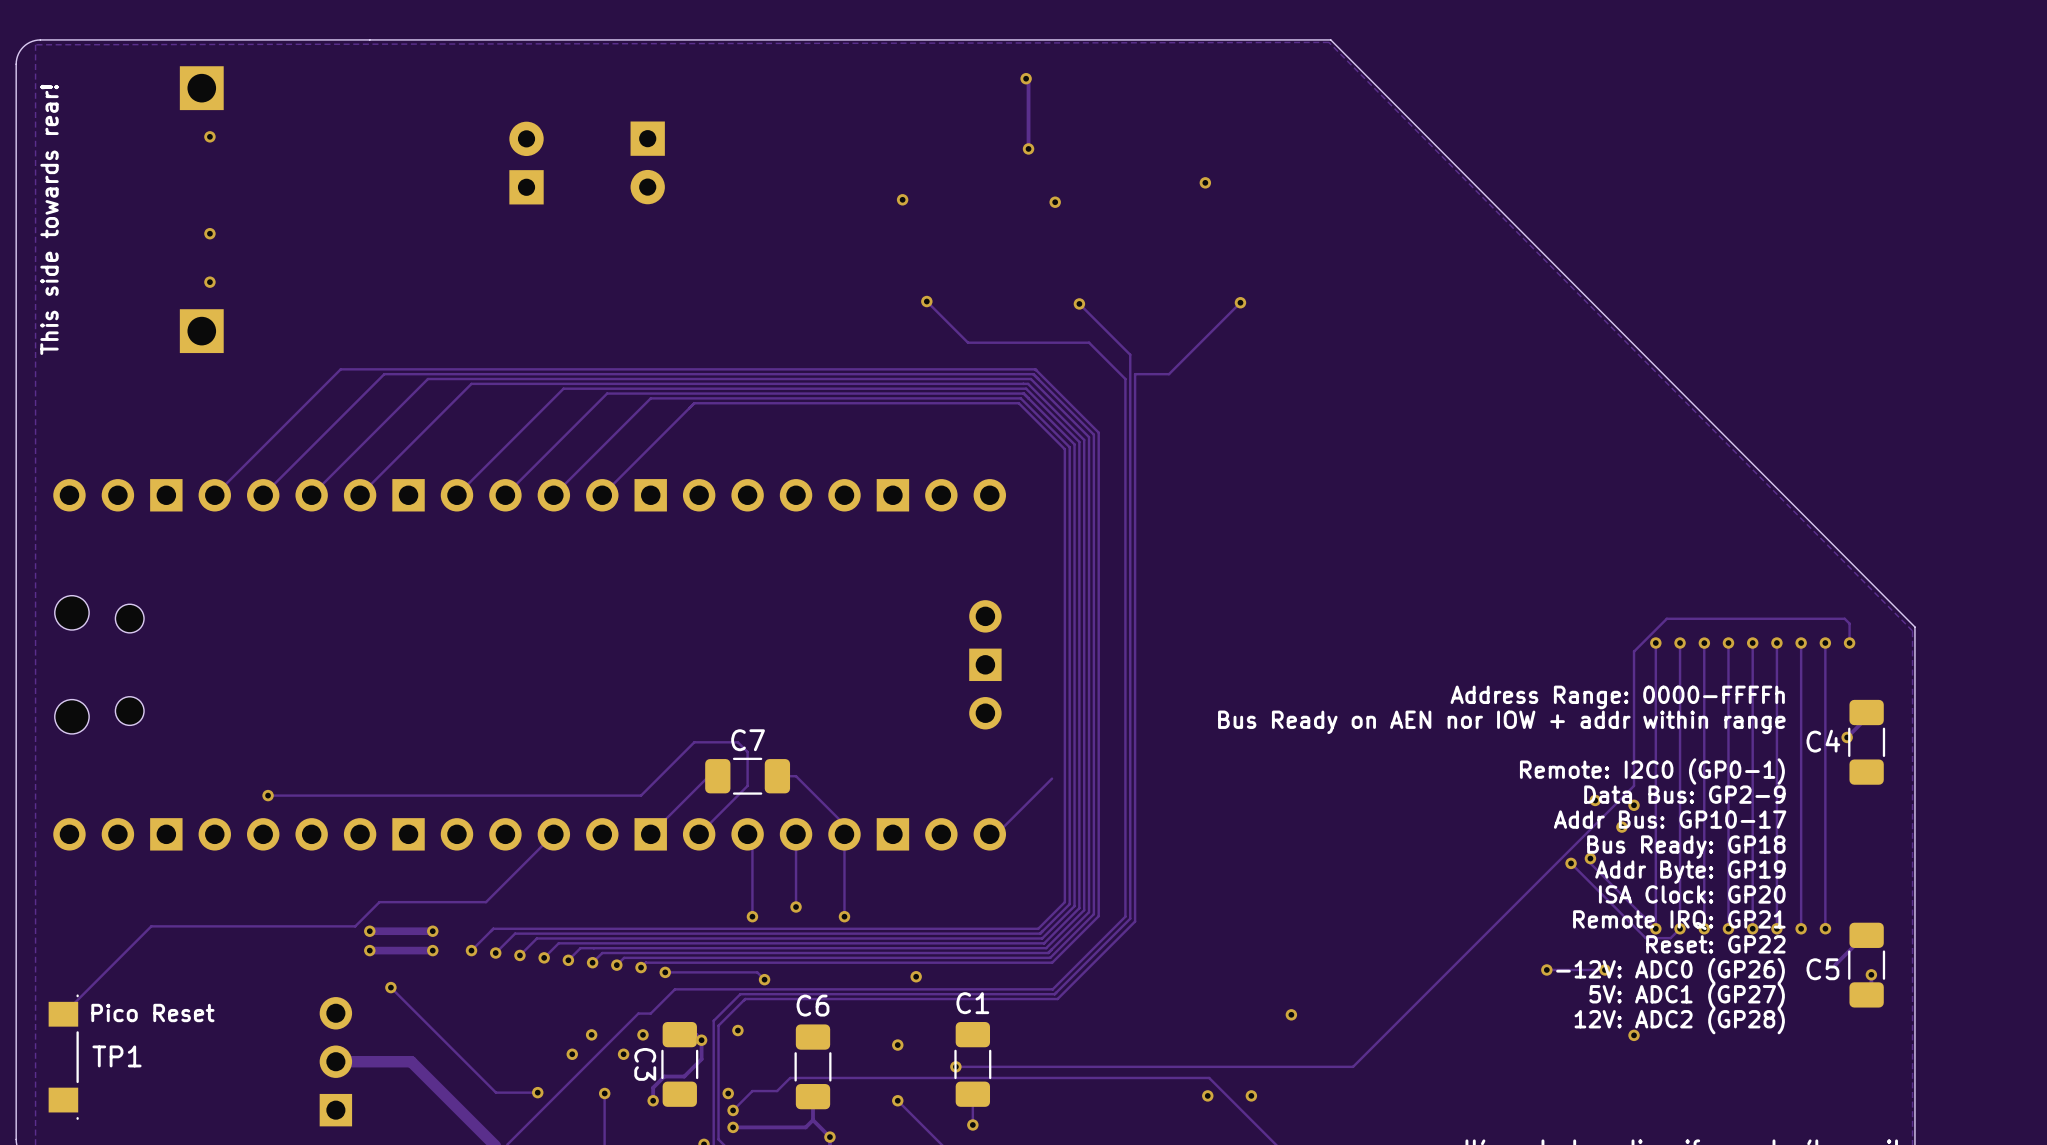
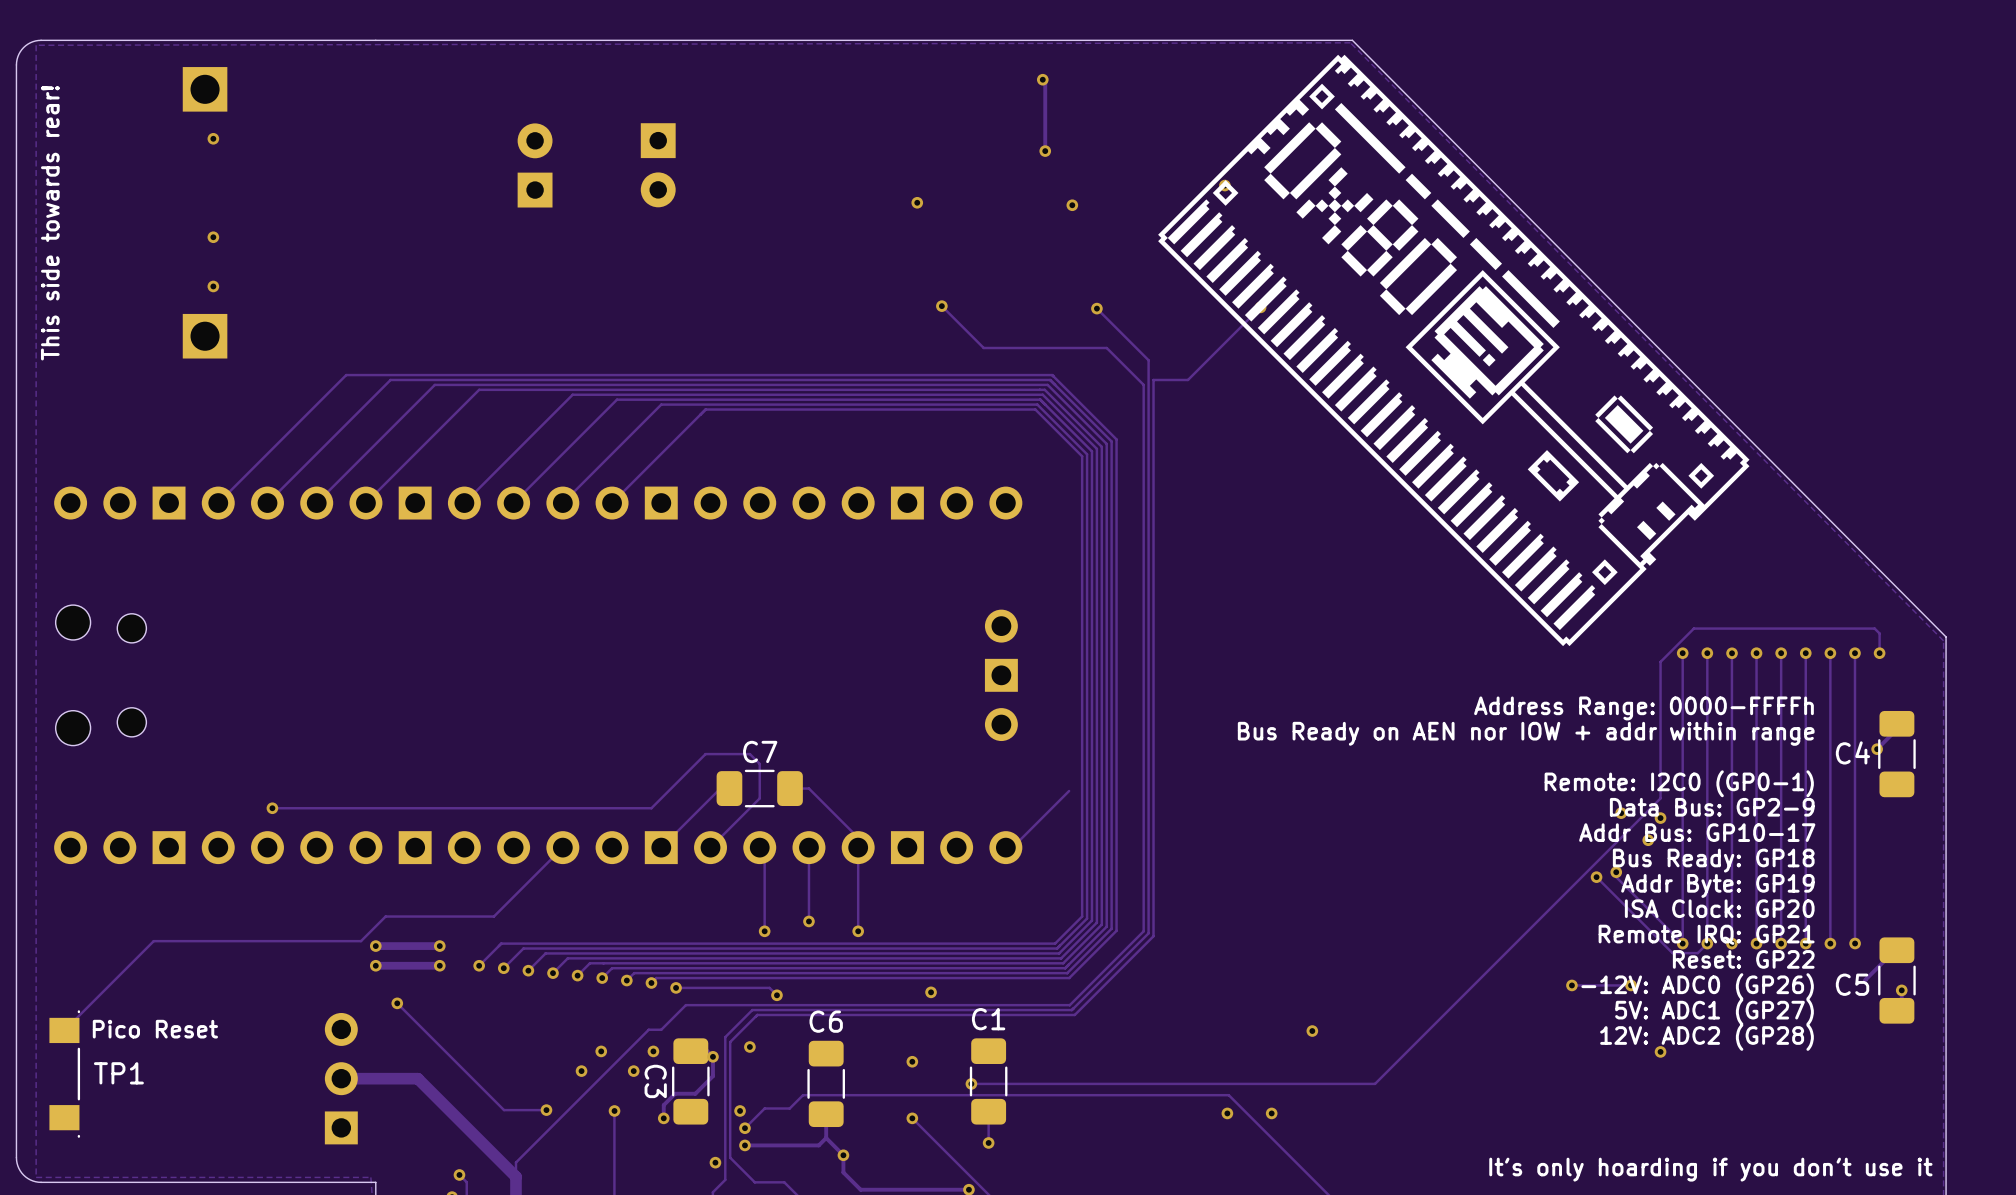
part: none -> (1453, 350)

